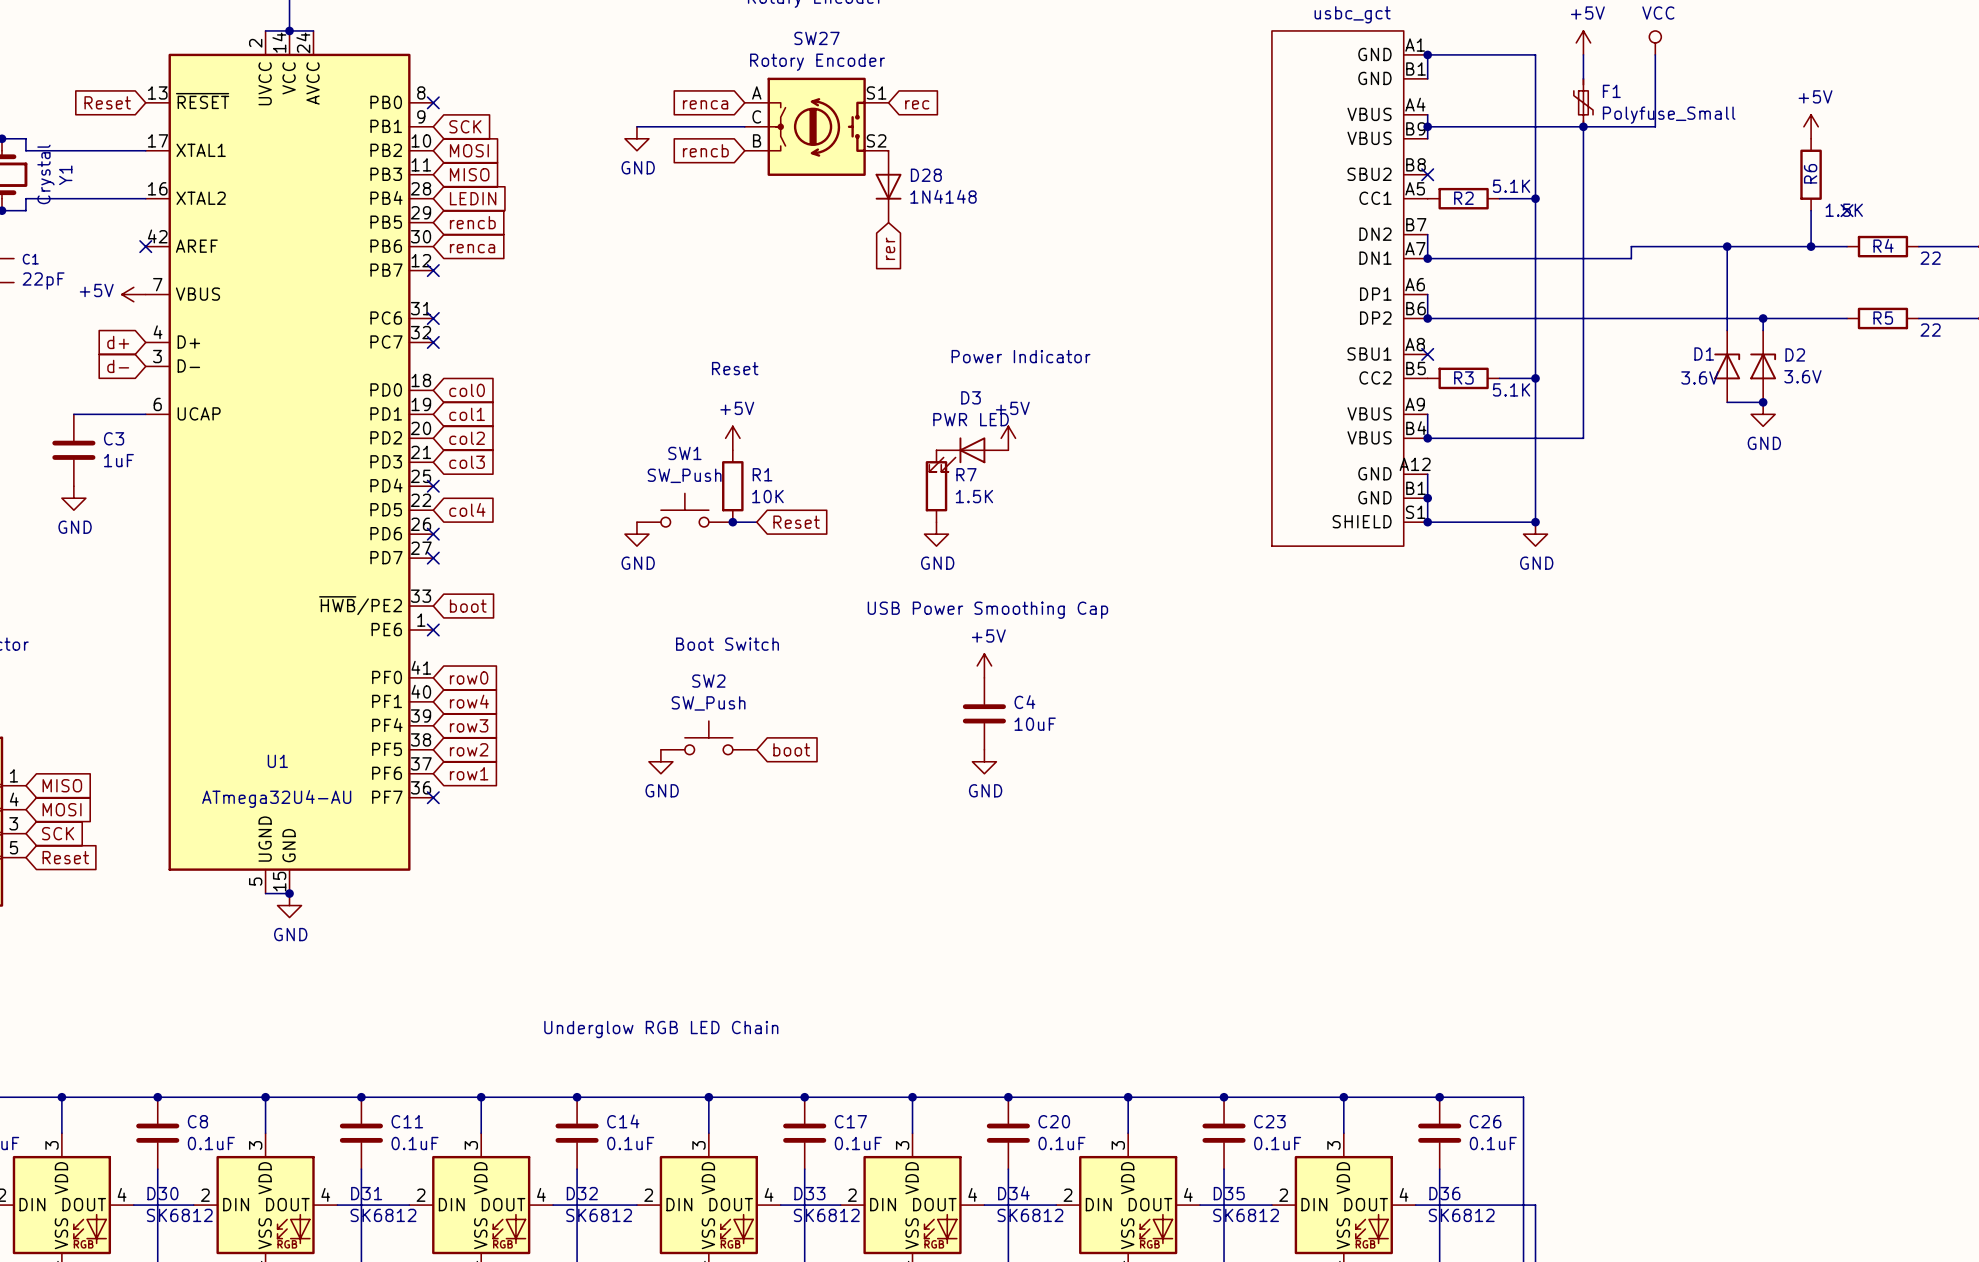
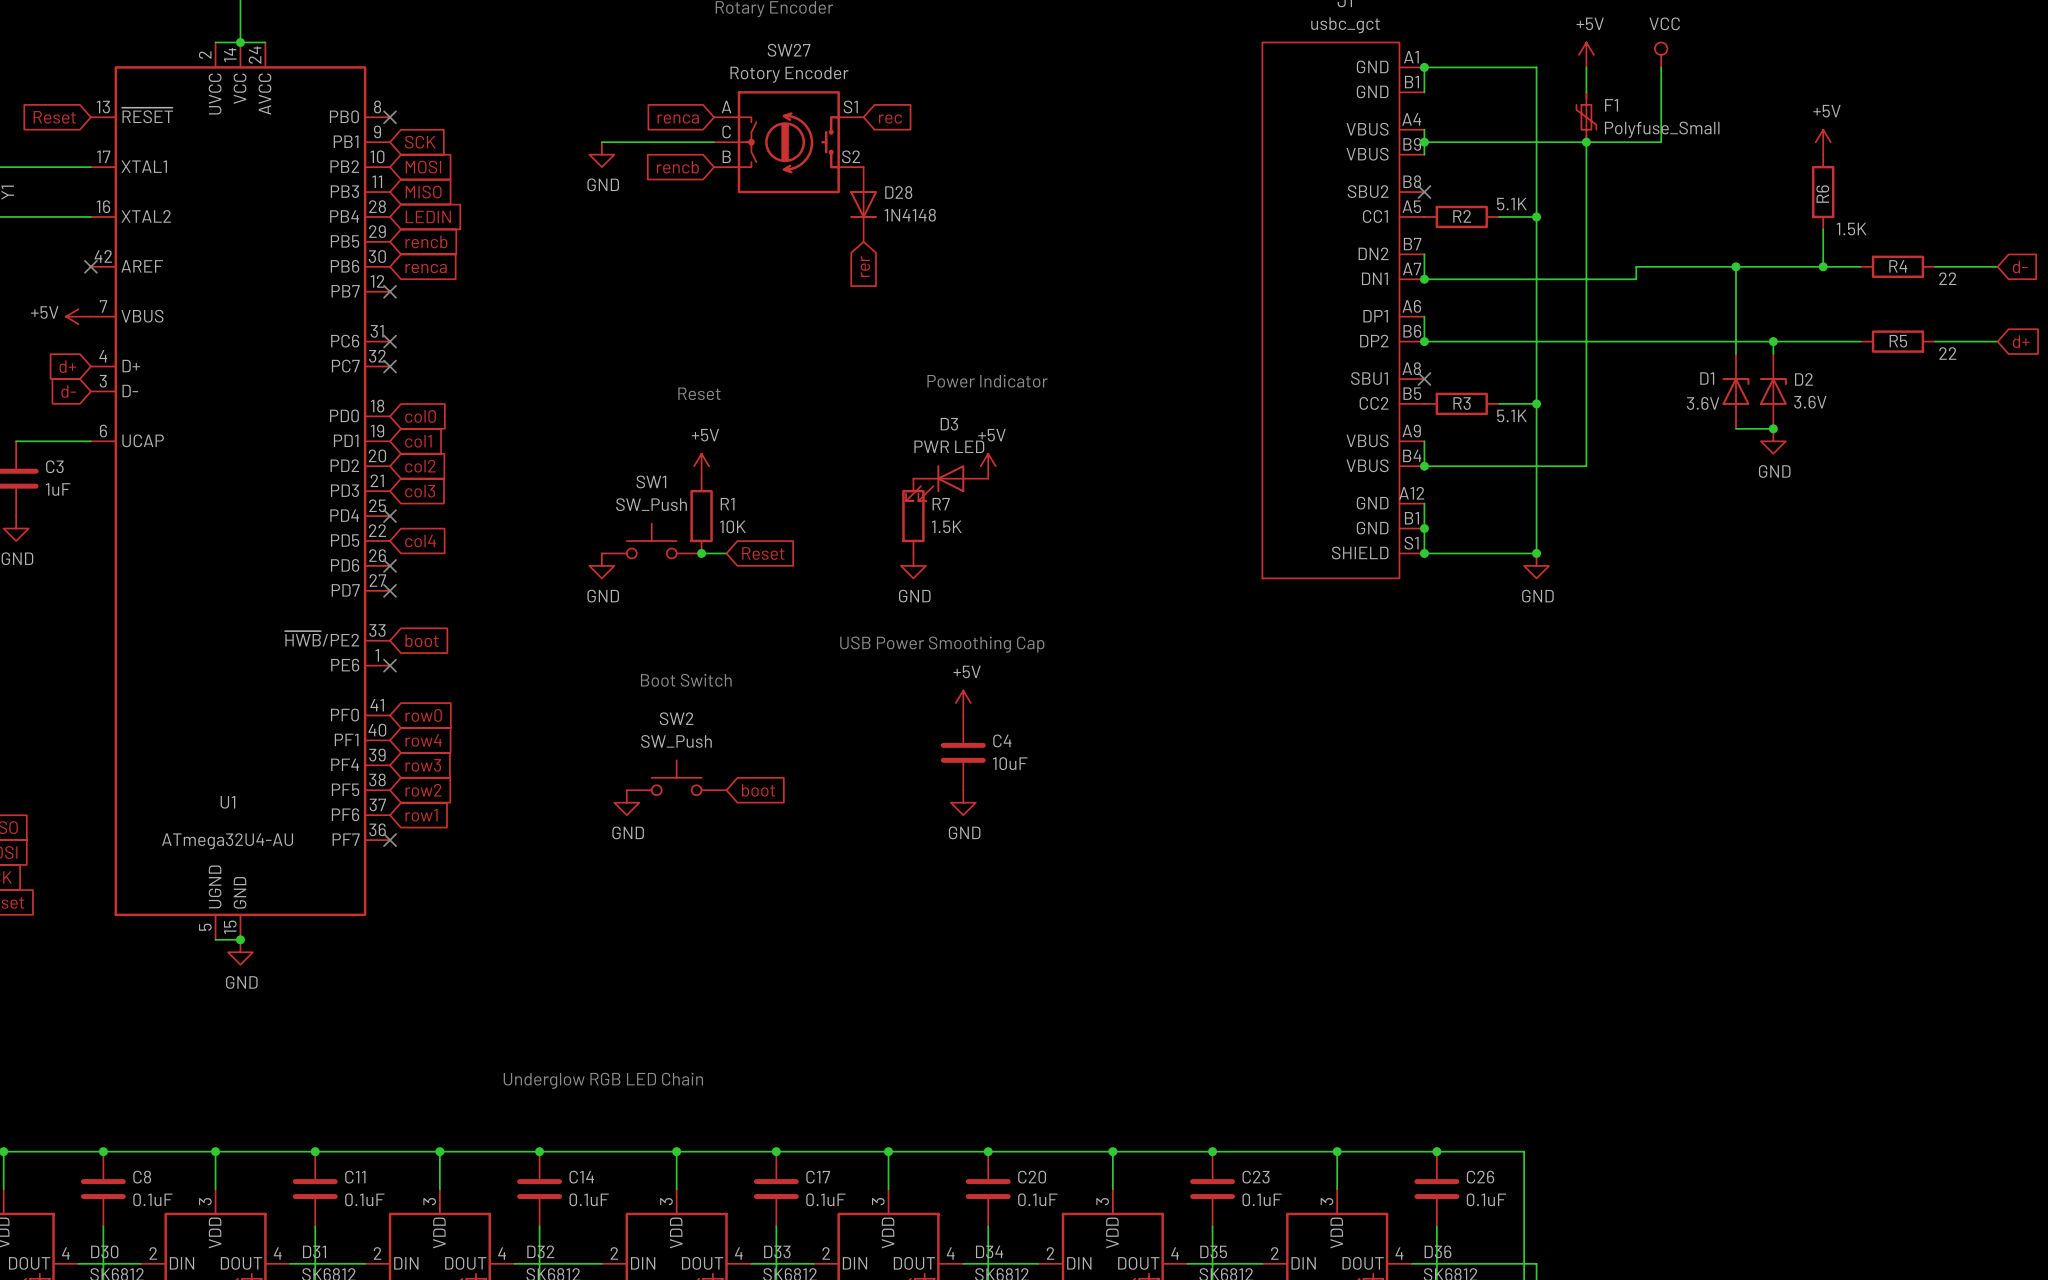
no-connect mark: (1847, 210) -> none

